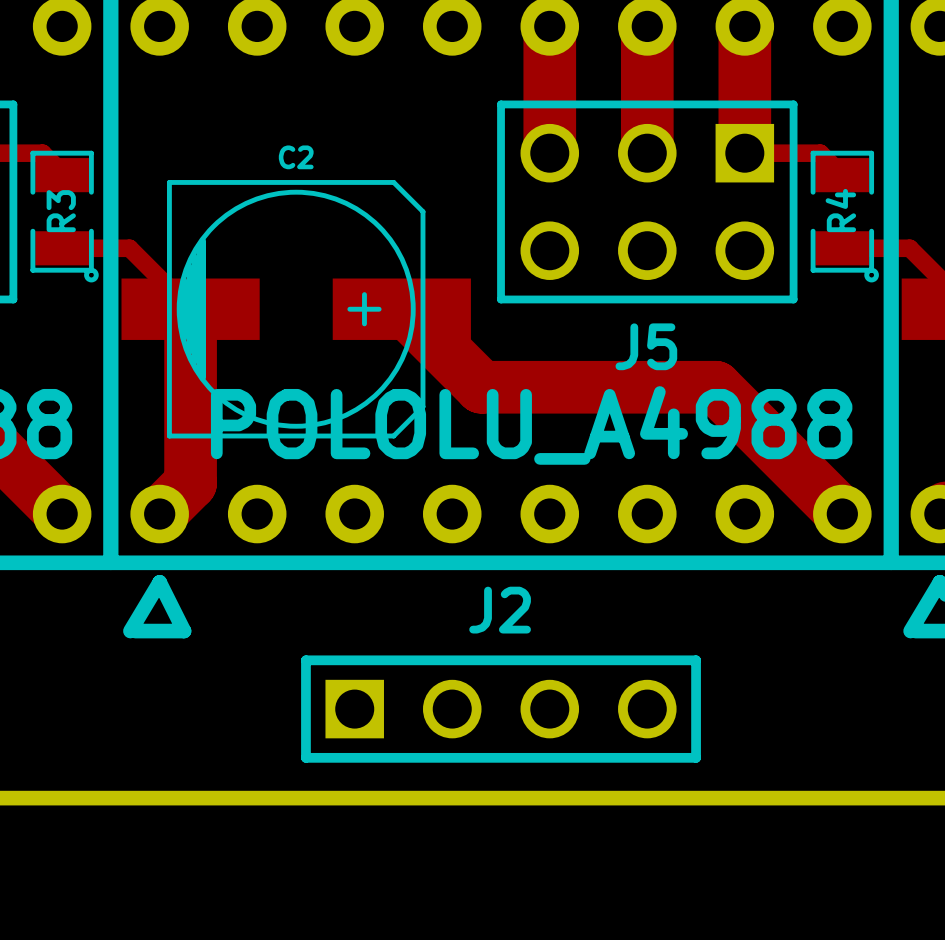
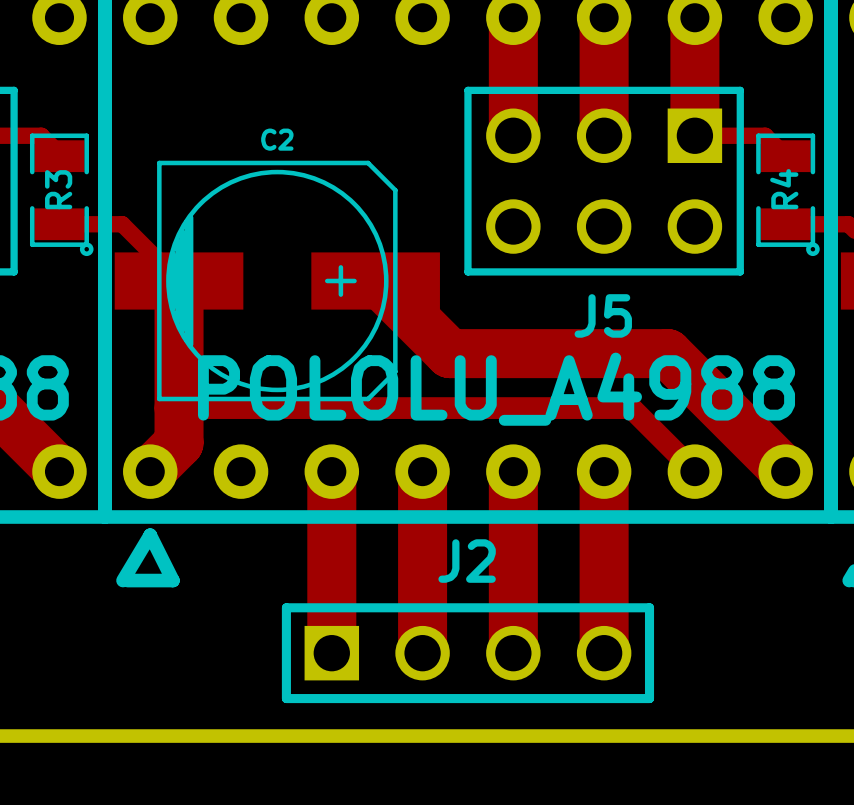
track: none -> (179, 408) (631, 408) (694, 471)
track: none -> (331, 471) (331, 653)
track: none -> (422, 471) (422, 653)
track: none -> (513, 471) (513, 653)
track: none -> (604, 471) (604, 653)

